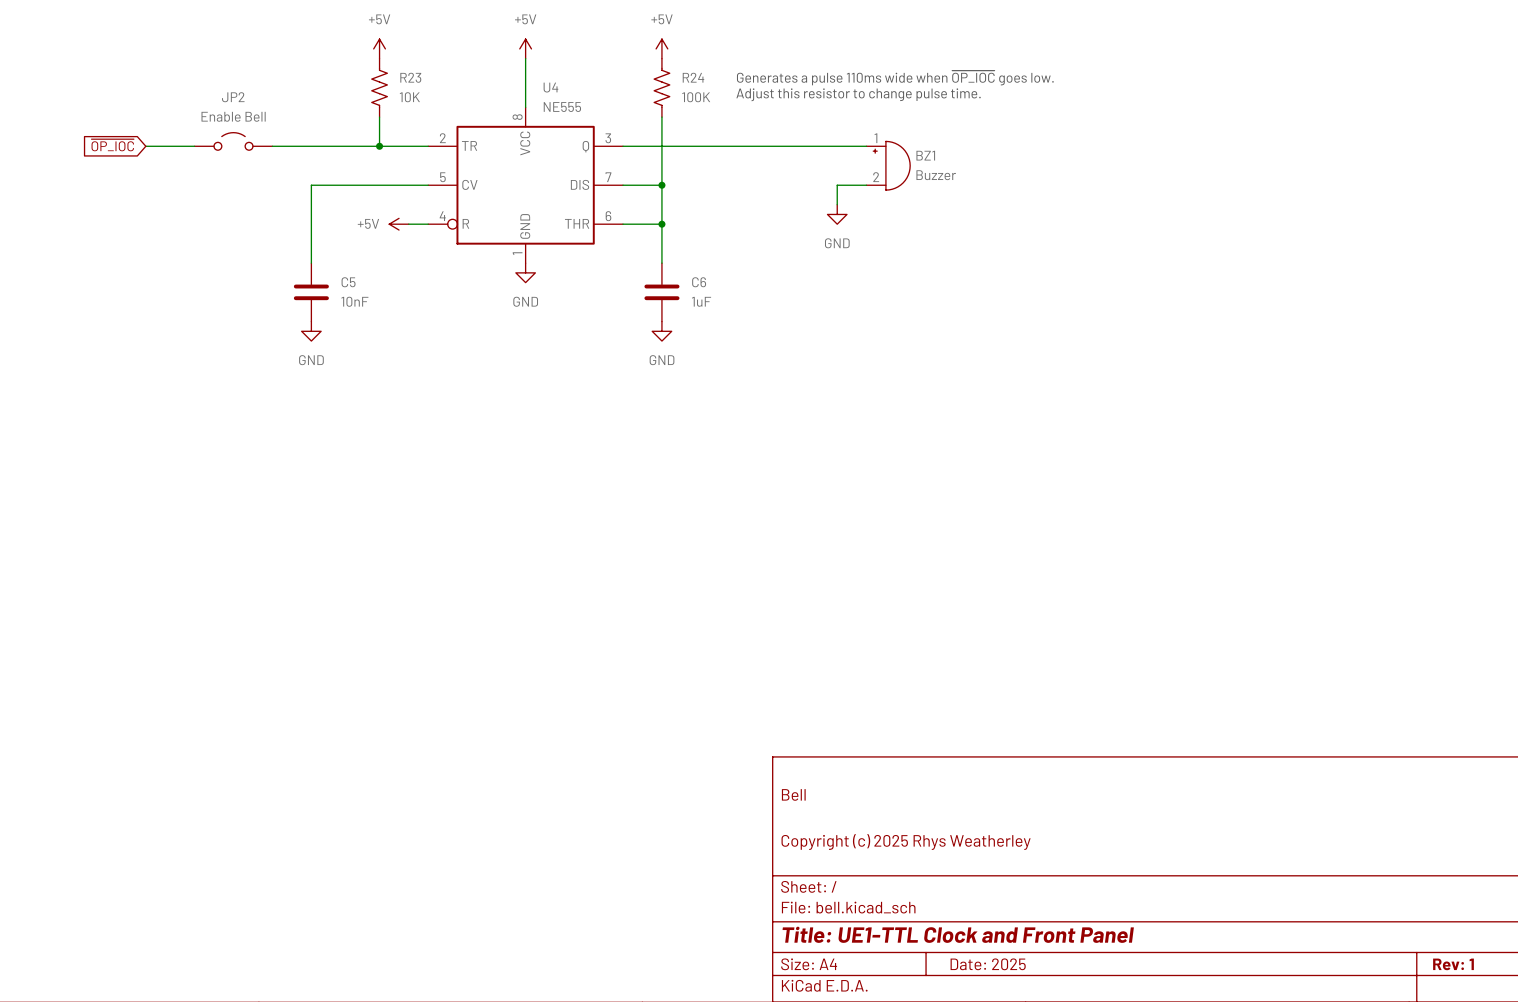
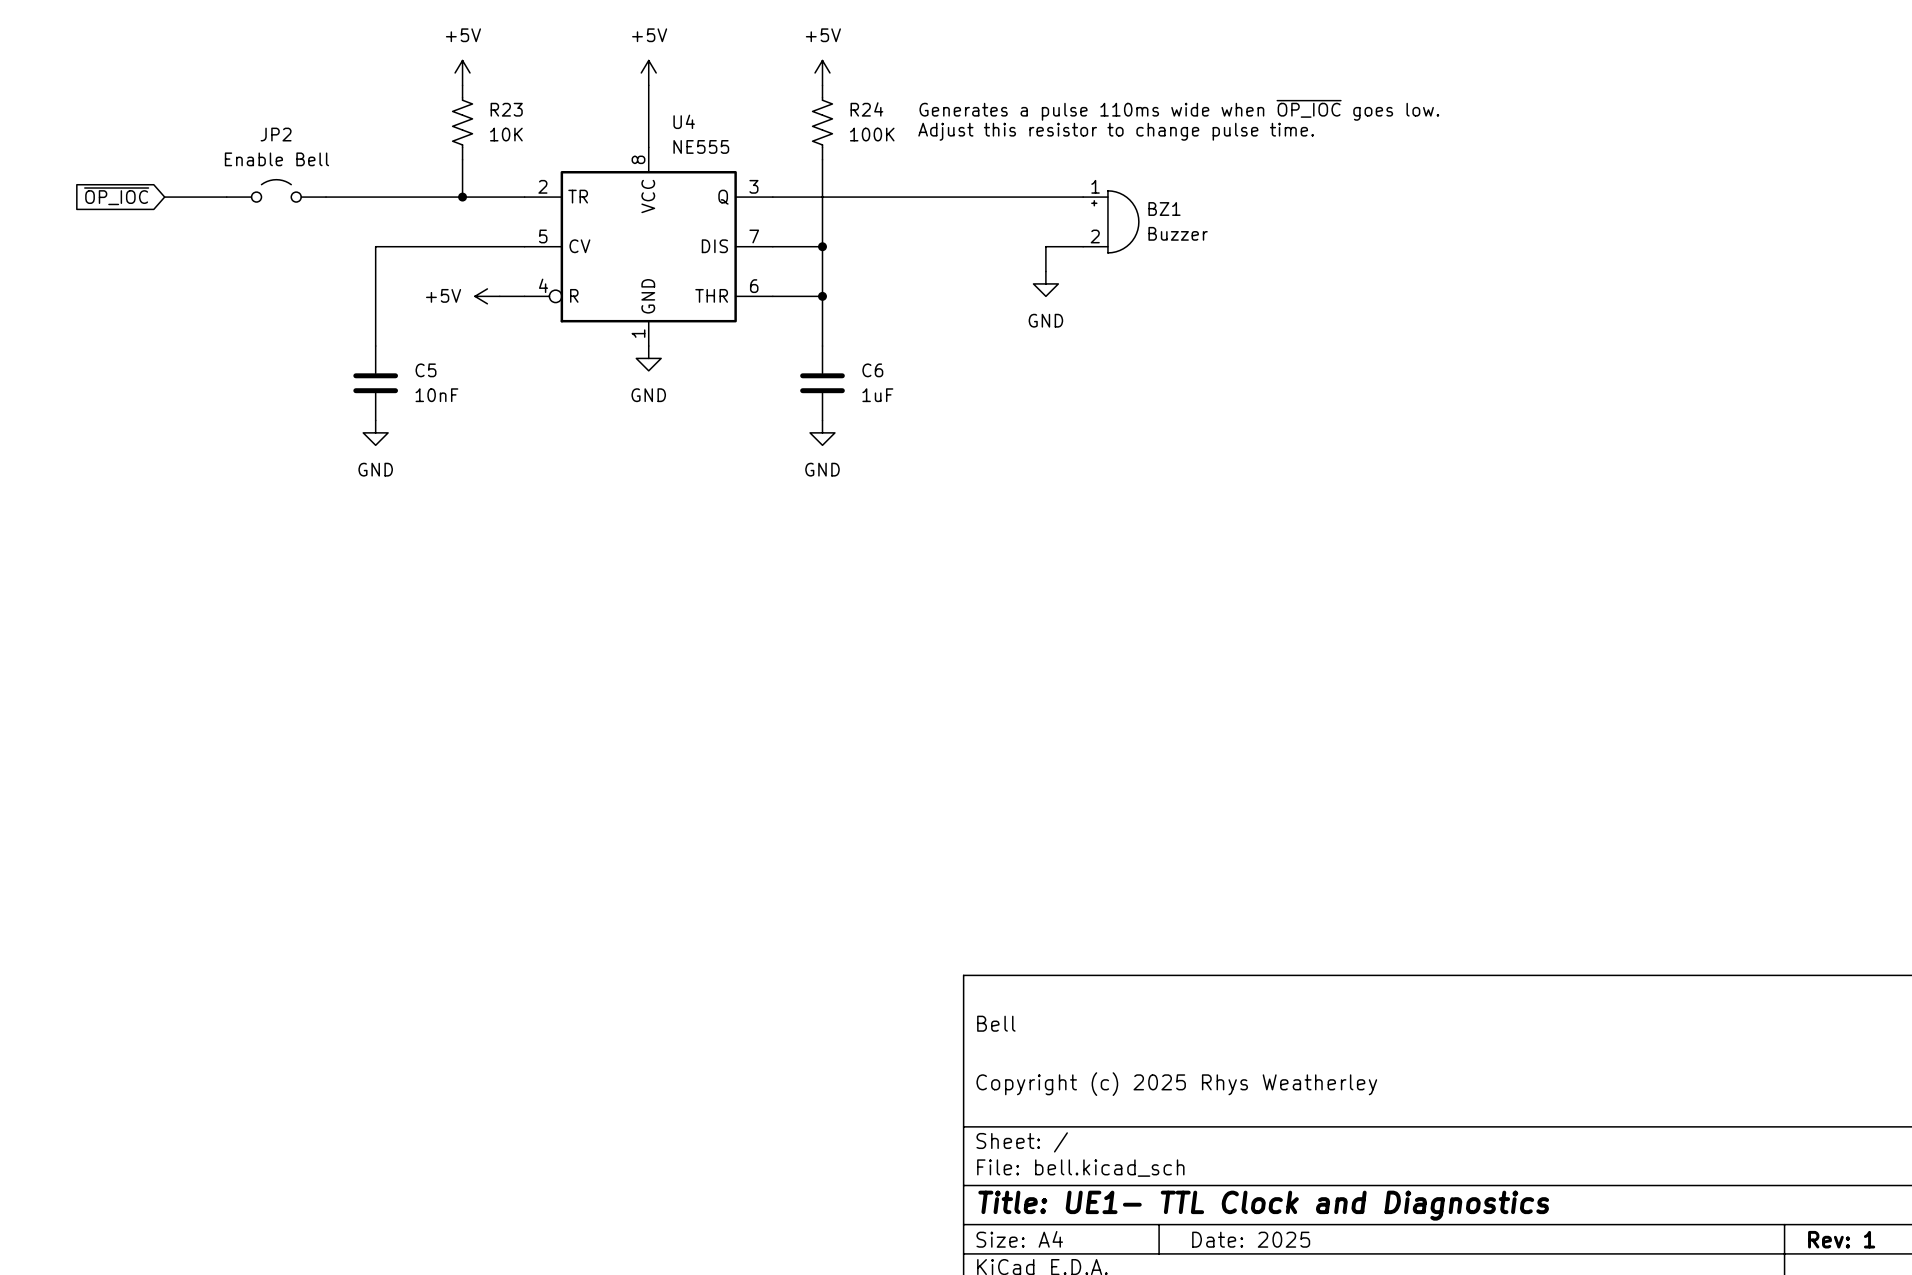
title block: Title: UE1-TTL Clock and Front Panel (958, 934) -> Title: UE1- TTL Clock and Diagnostics (1263, 1205)

